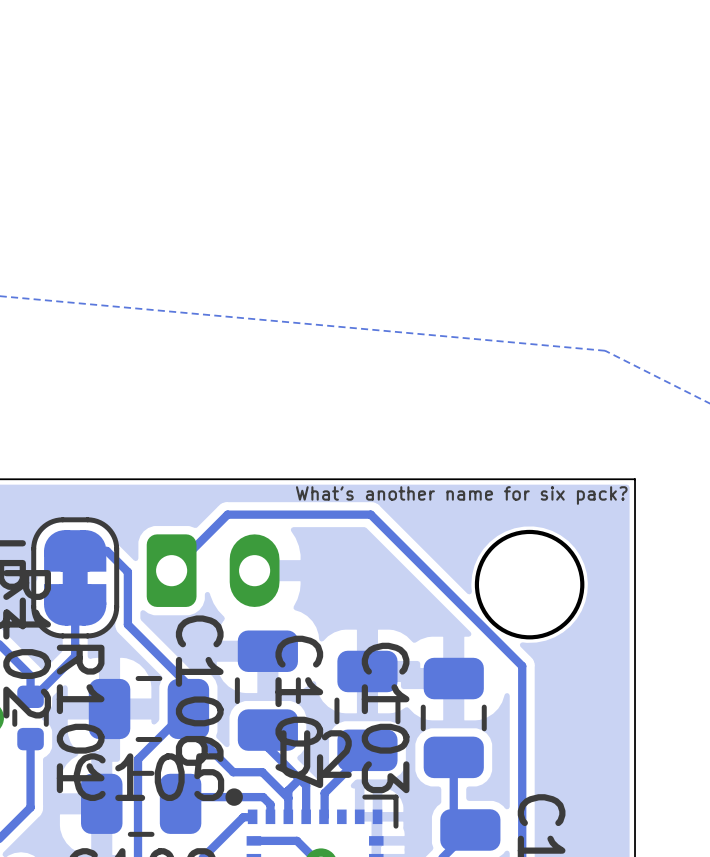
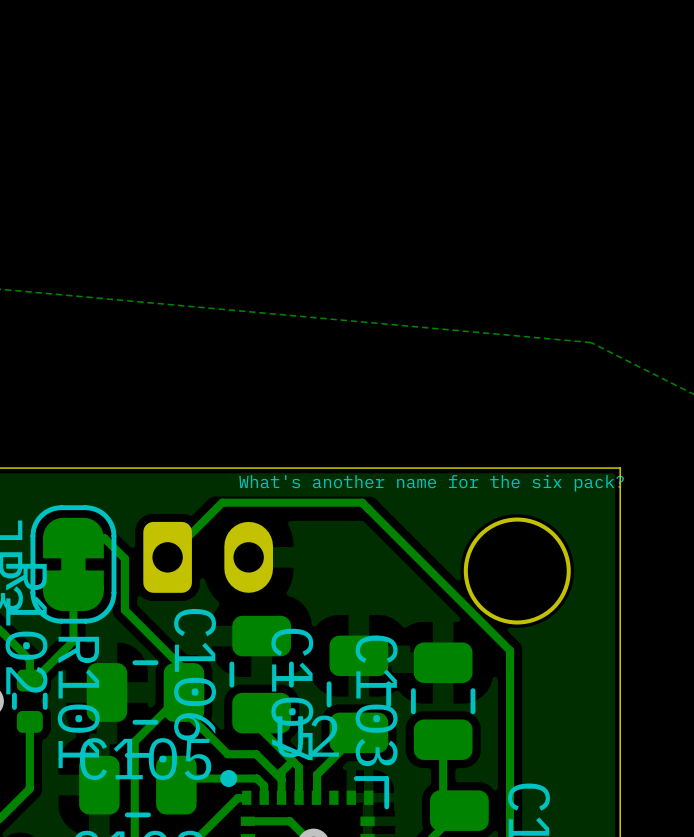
text: What's another name for six pack? (461, 495) -> What's another name for the six pack? (431, 483)

